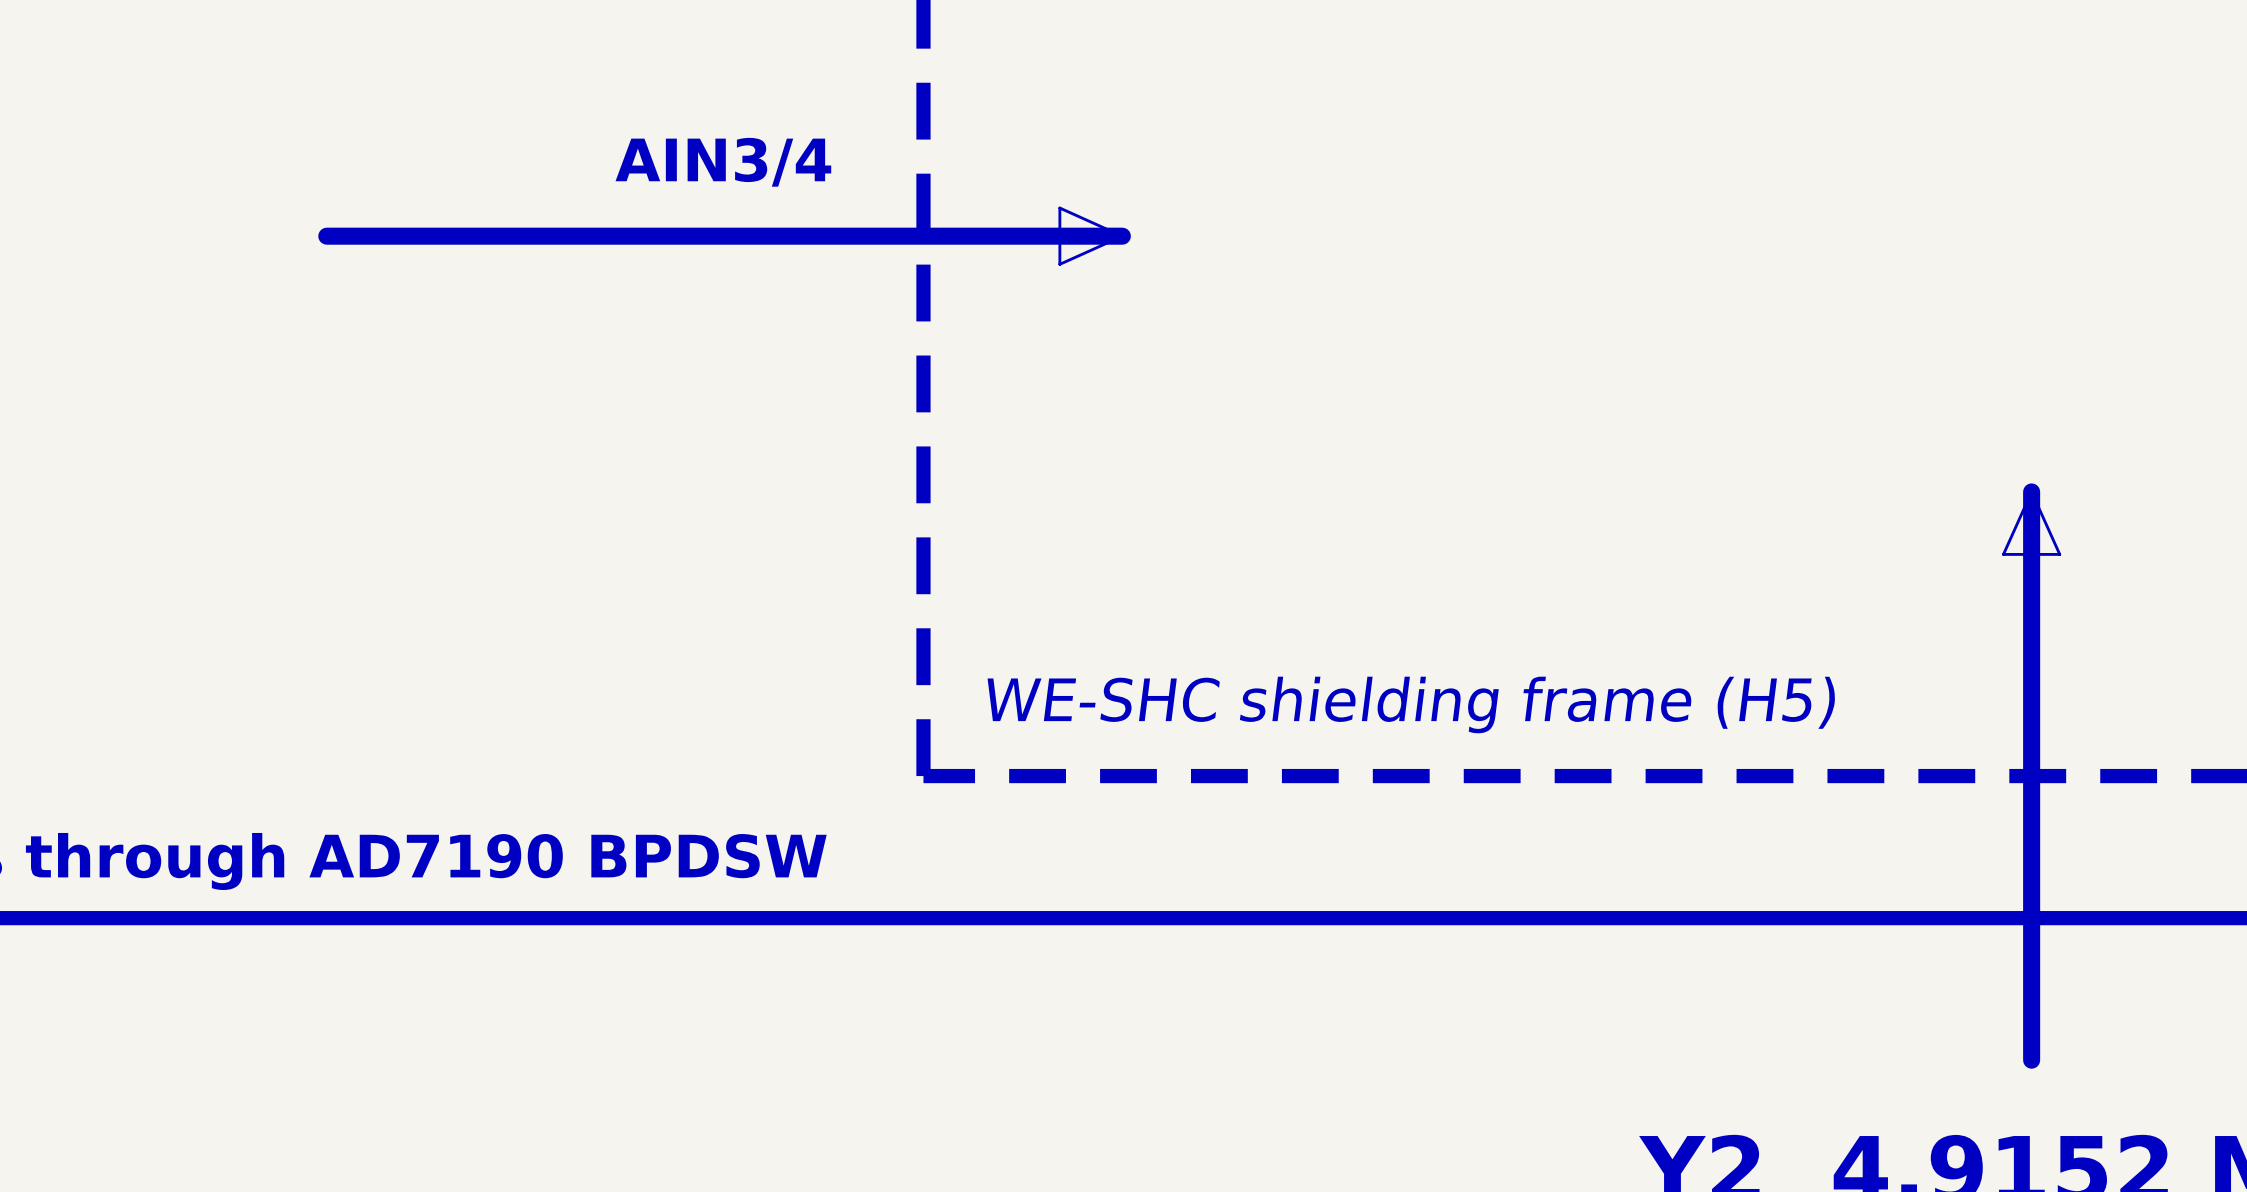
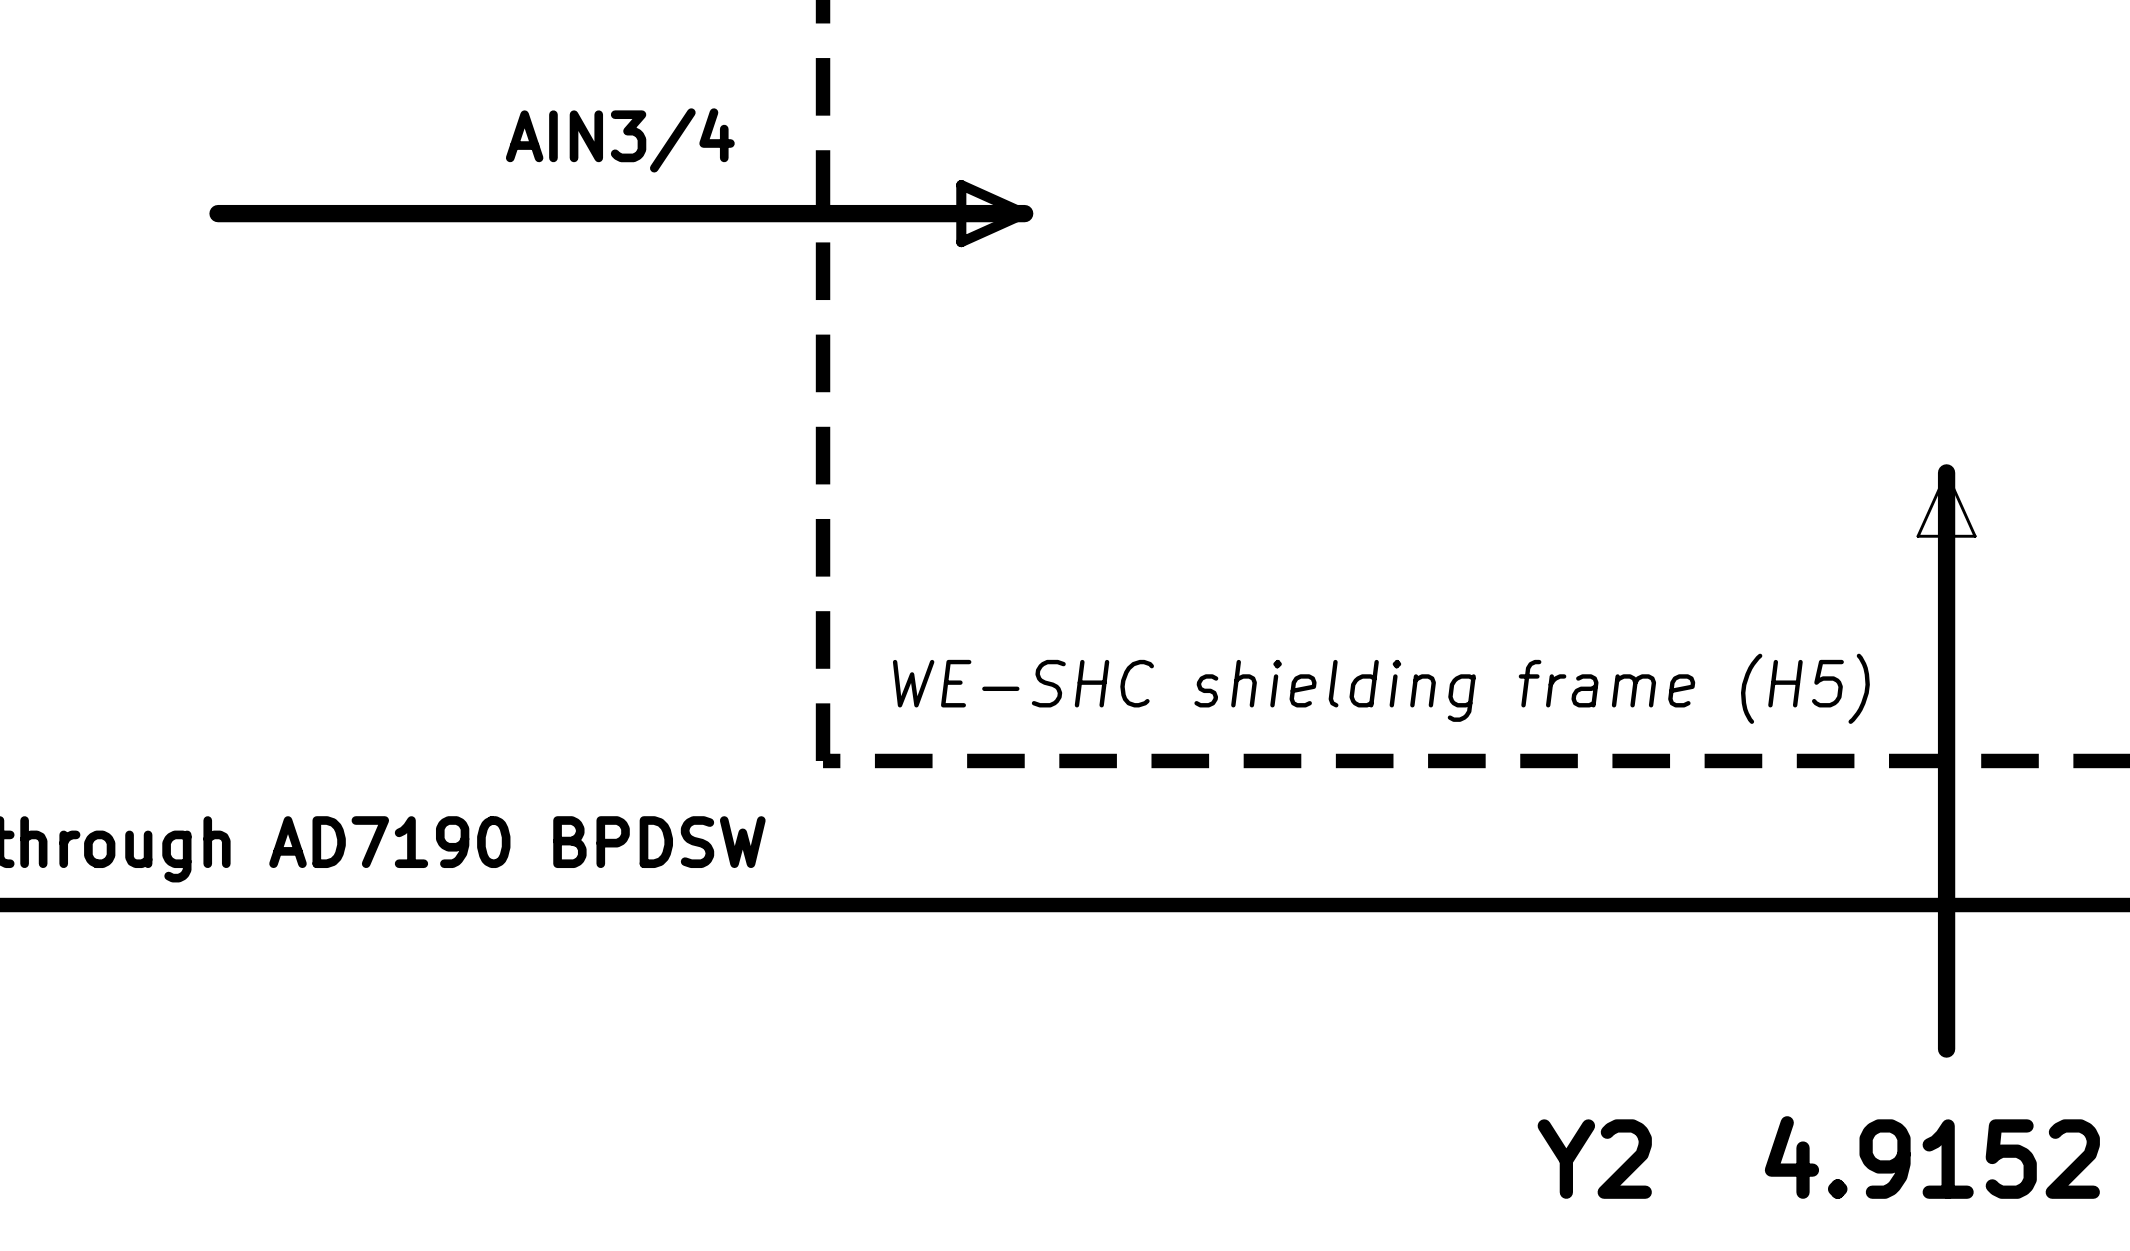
line width: thin (1059, 208) (1059, 264) (1122, 236) (1059, 208) -> thick (961, 185) (961, 242) (1024, 213) (961, 185)

